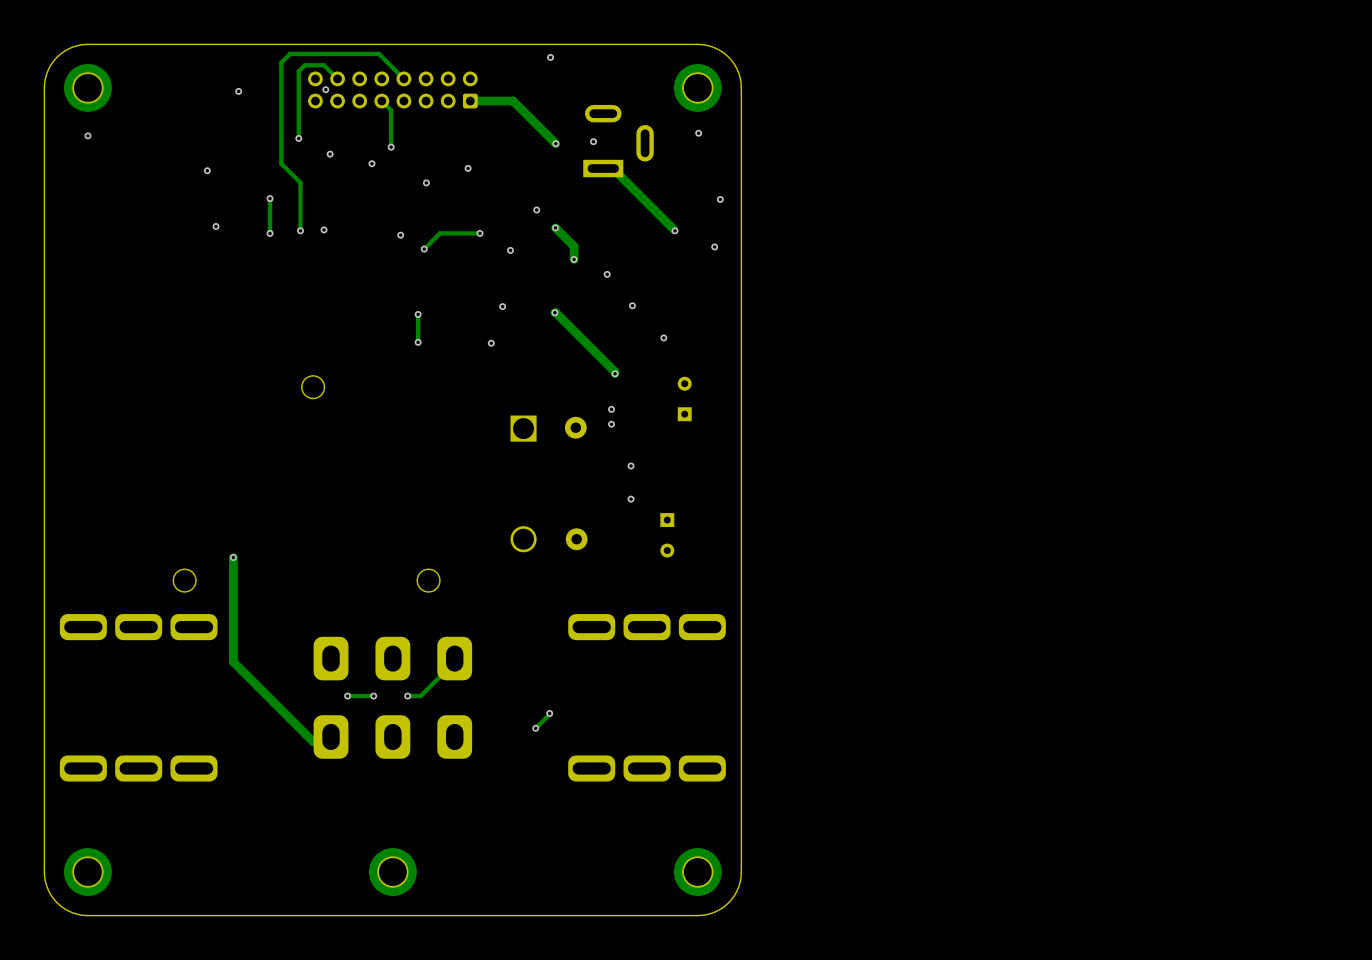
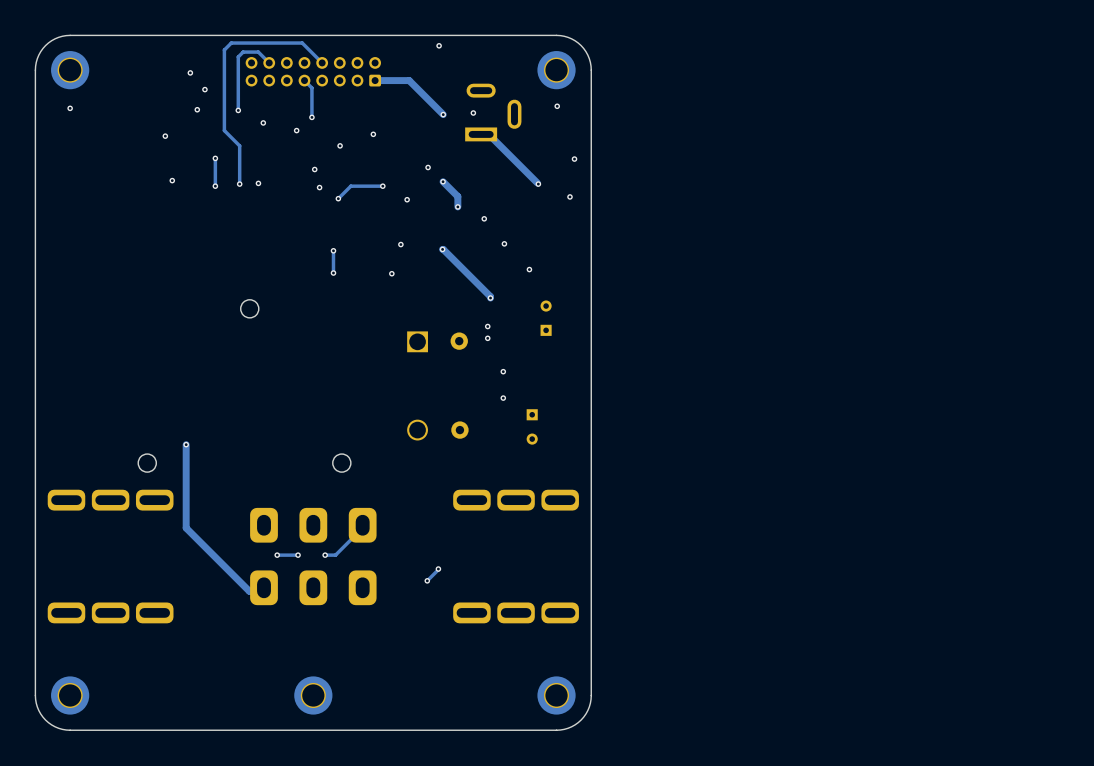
via: (325, 89) -> none
via: none -> (204, 89)
via: none -> (197, 109)
via: none -> (314, 169)

